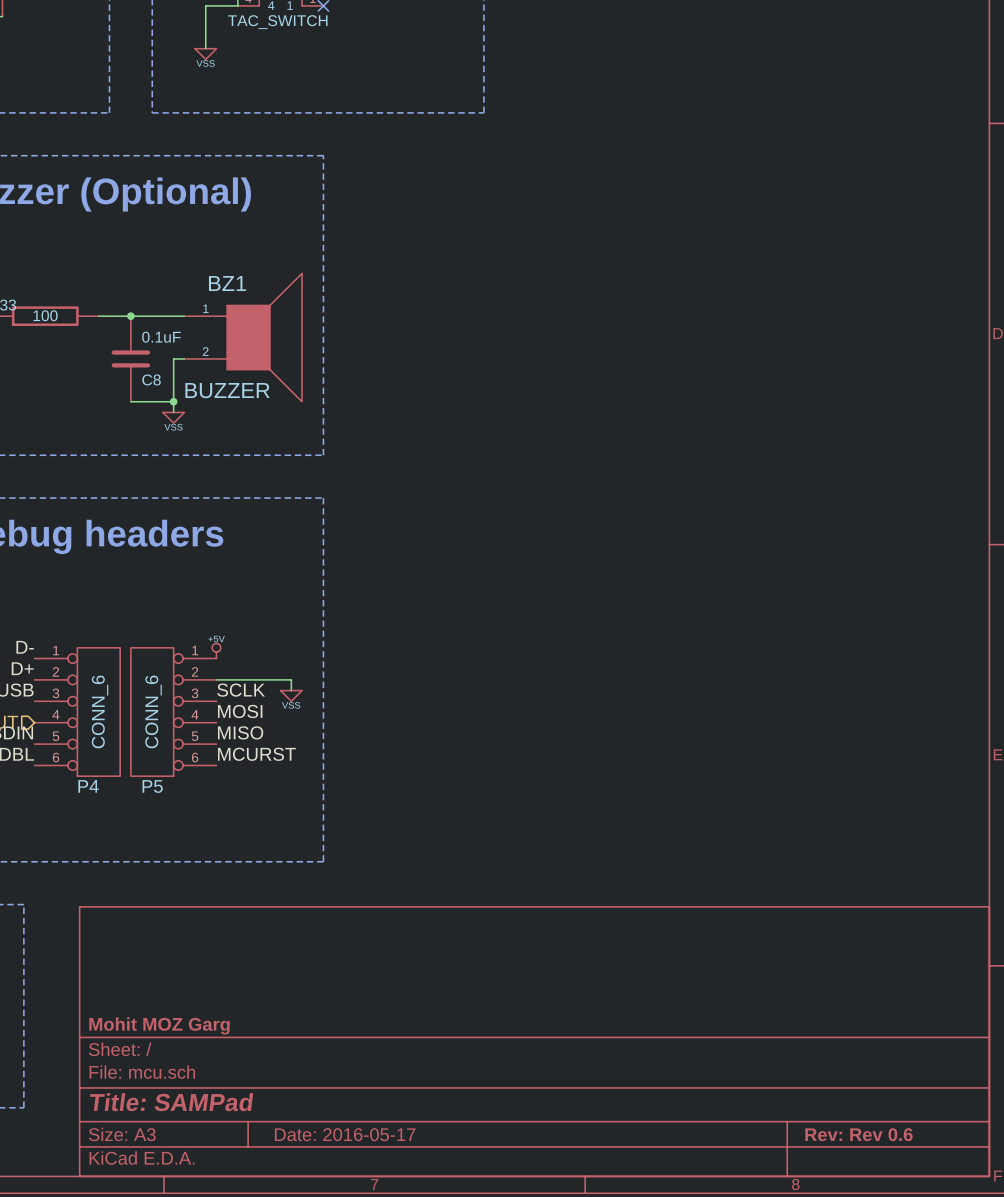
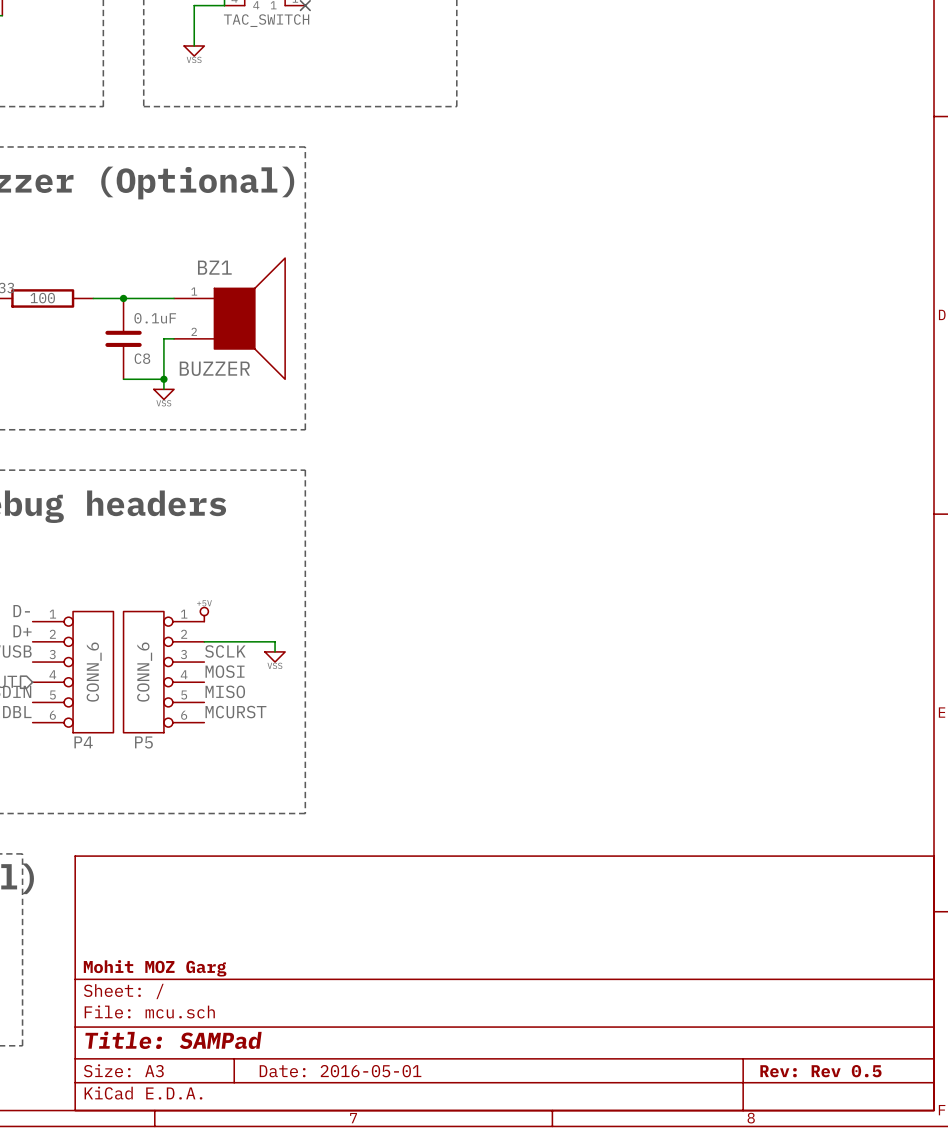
title block: Date: 2016-05-17 (345, 1134) -> Date: 2016-05-01 (340, 1071)
title block: Rev: Rev 0.6 (858, 1134) -> Rev: Rev 0.5 (820, 1071)

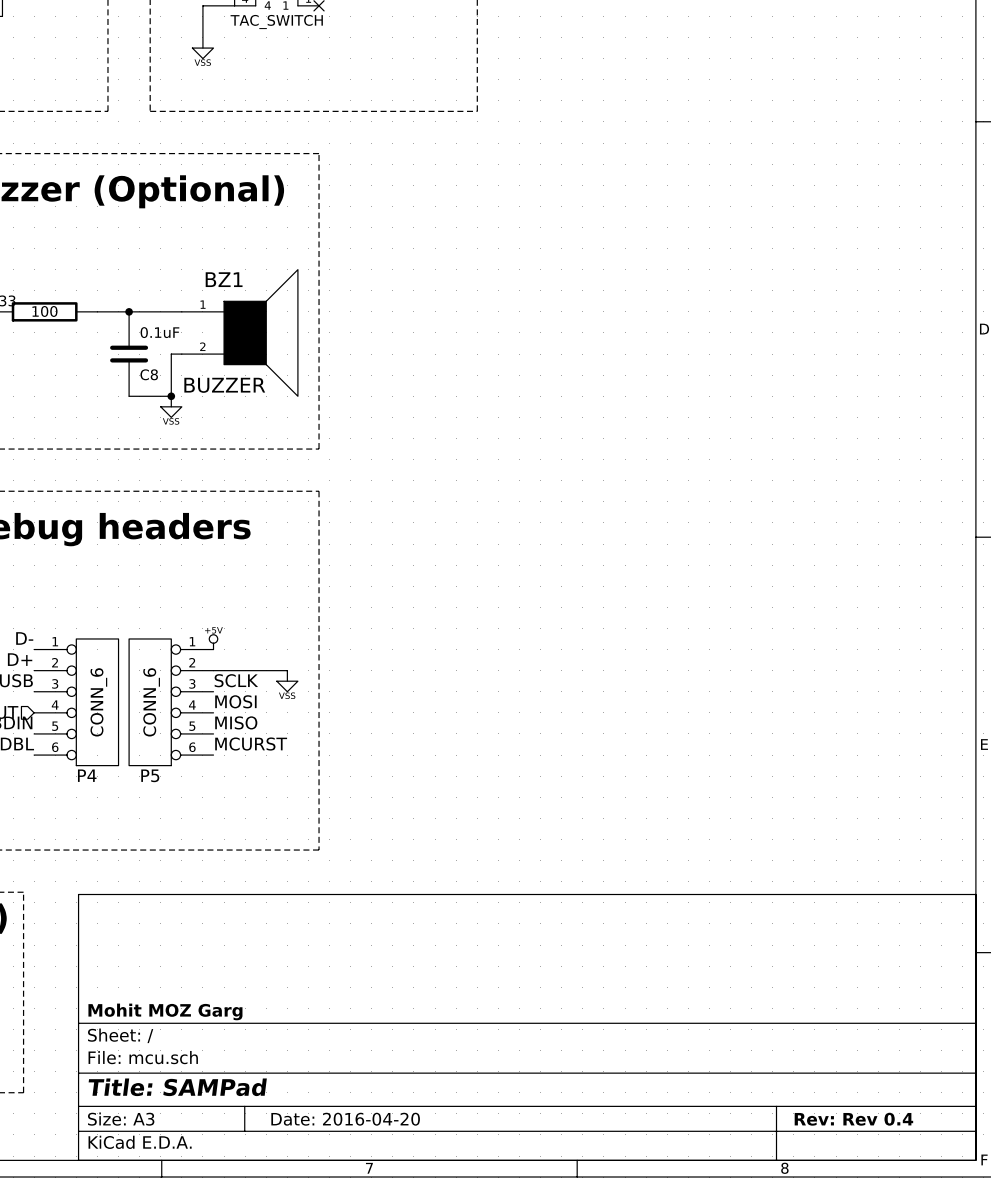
title block: Date: 2016-05-01 (340, 1071) -> Date: 2016-04-20 (345, 1119)
title block: Rev: Rev 0.5 (820, 1071) -> Rev: Rev 0.4 (853, 1119)

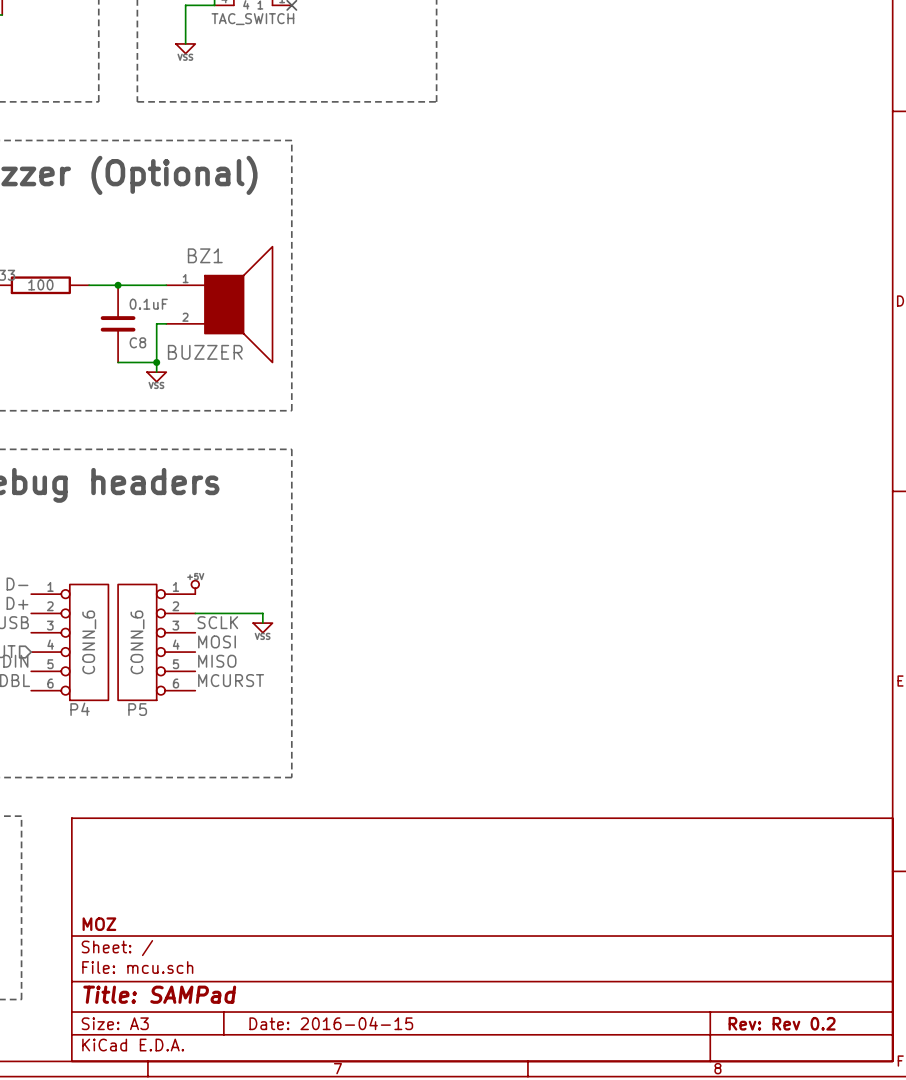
title block: Mohit MOZ Garg (165, 1011) -> MOZ (99, 924)
title block: Date: 2016-04-20 (345, 1119) -> Date: 2016-04-15 (331, 1023)
title block: Rev: Rev 0.4 (853, 1119) -> Rev: Rev 0.2 (782, 1023)

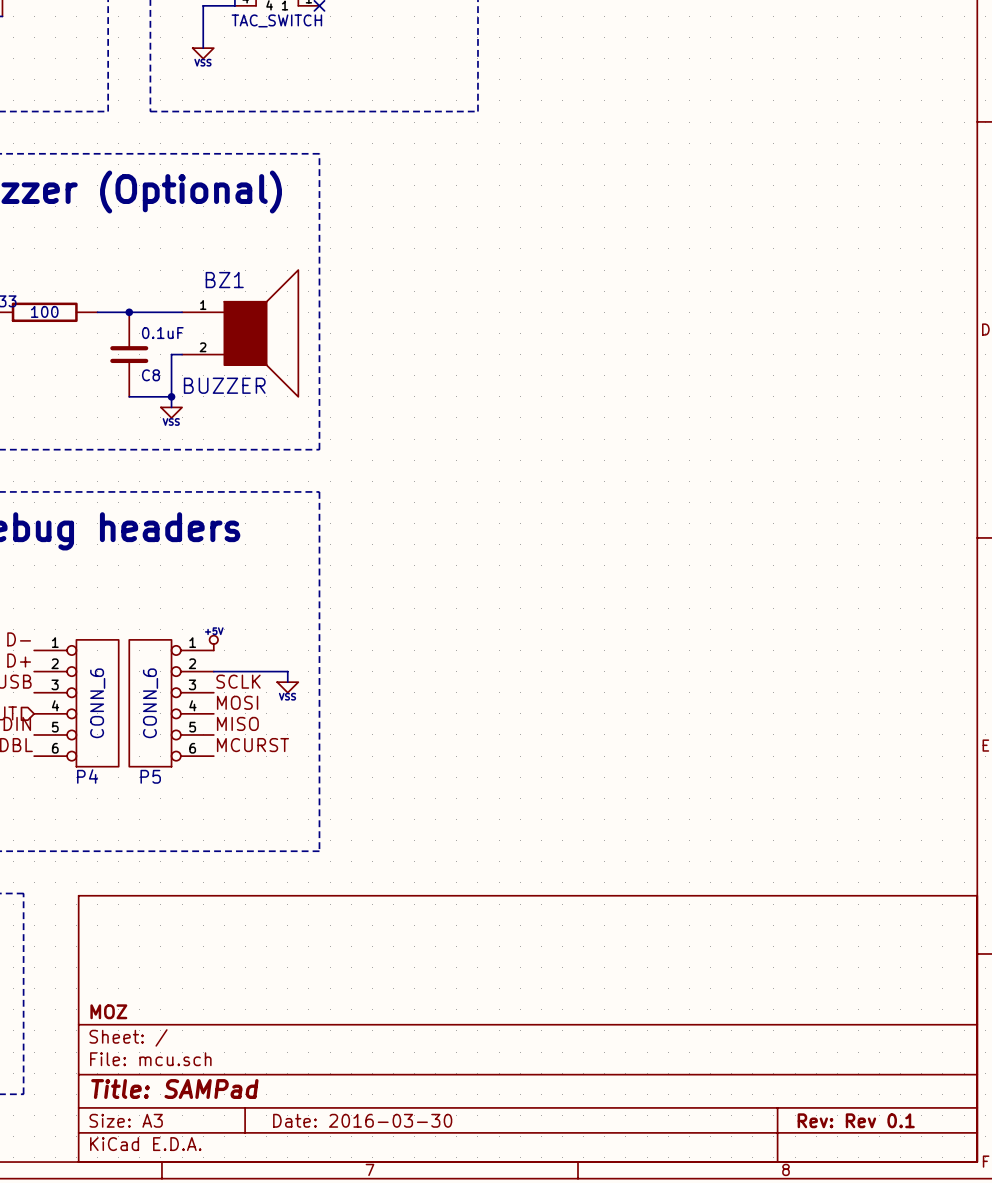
title block: Date: 2016-04-15 (331, 1023) -> Date: 2016-03-30 (362, 1120)
title block: Rev: Rev 0.2 (782, 1023) -> Rev: Rev 0.1 (856, 1120)

